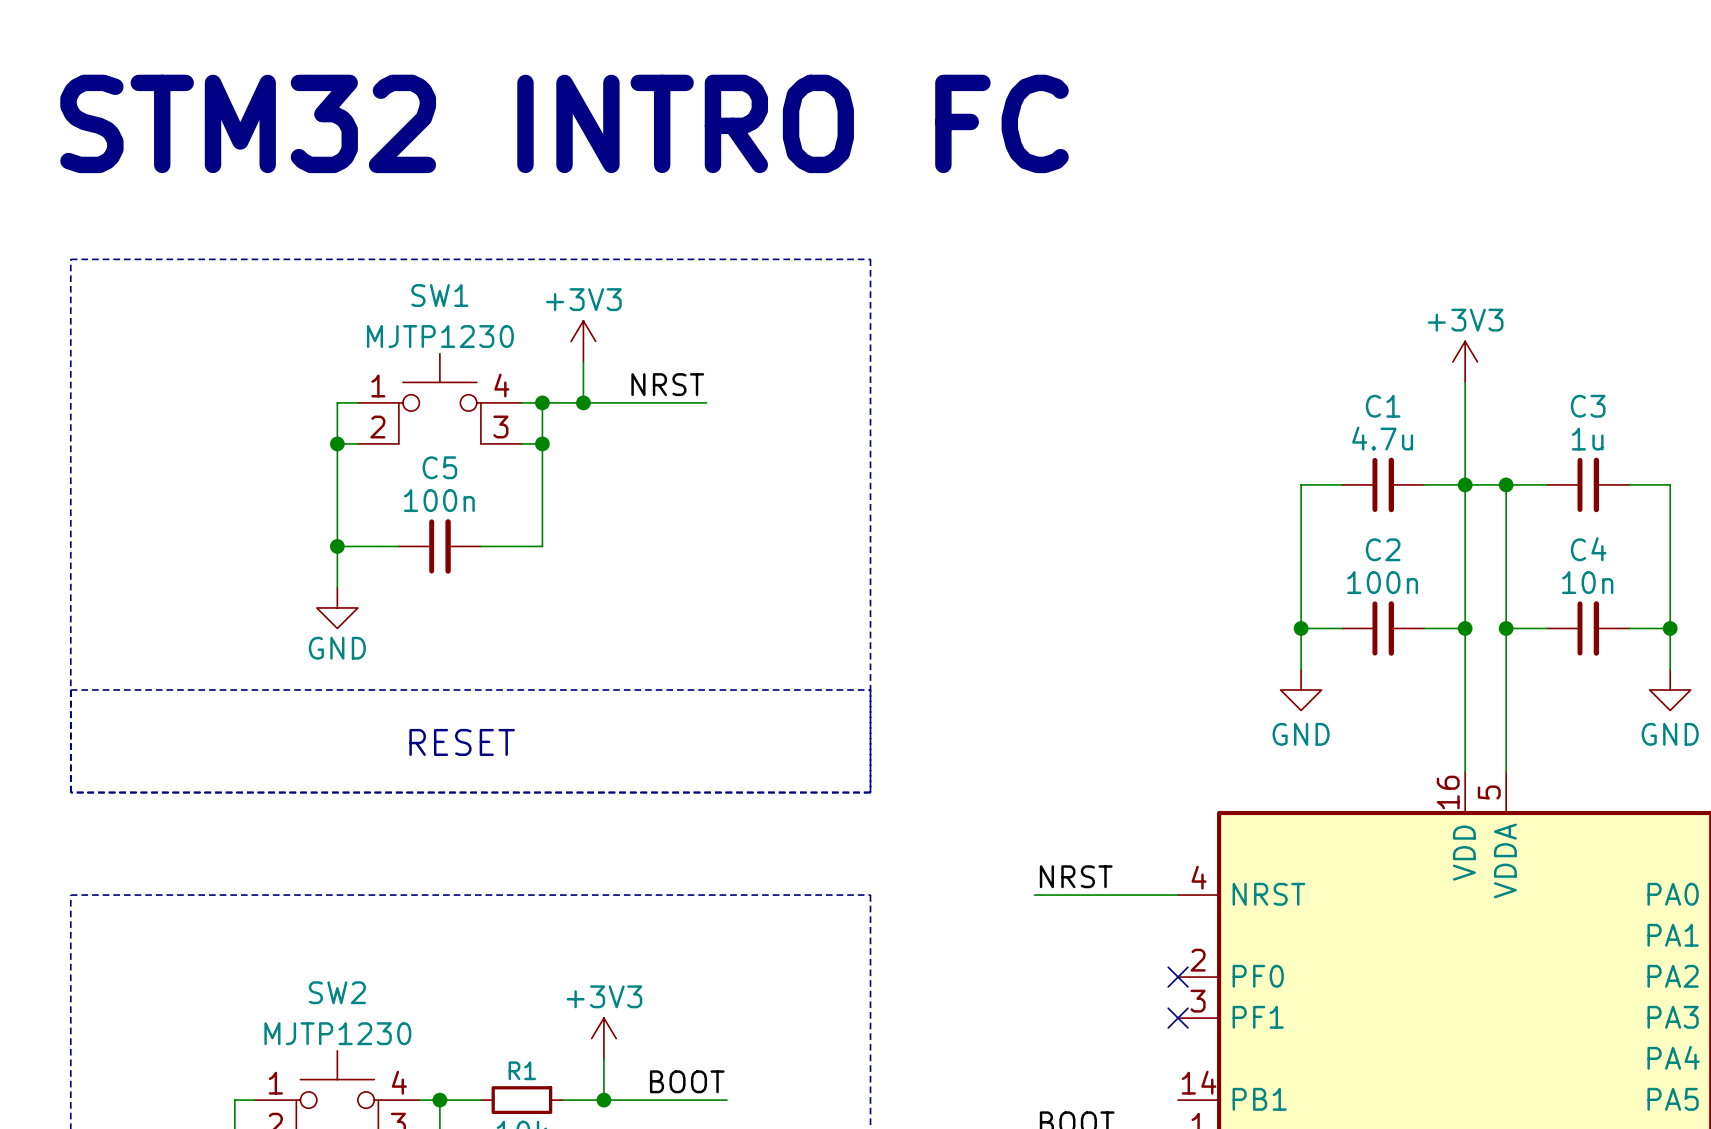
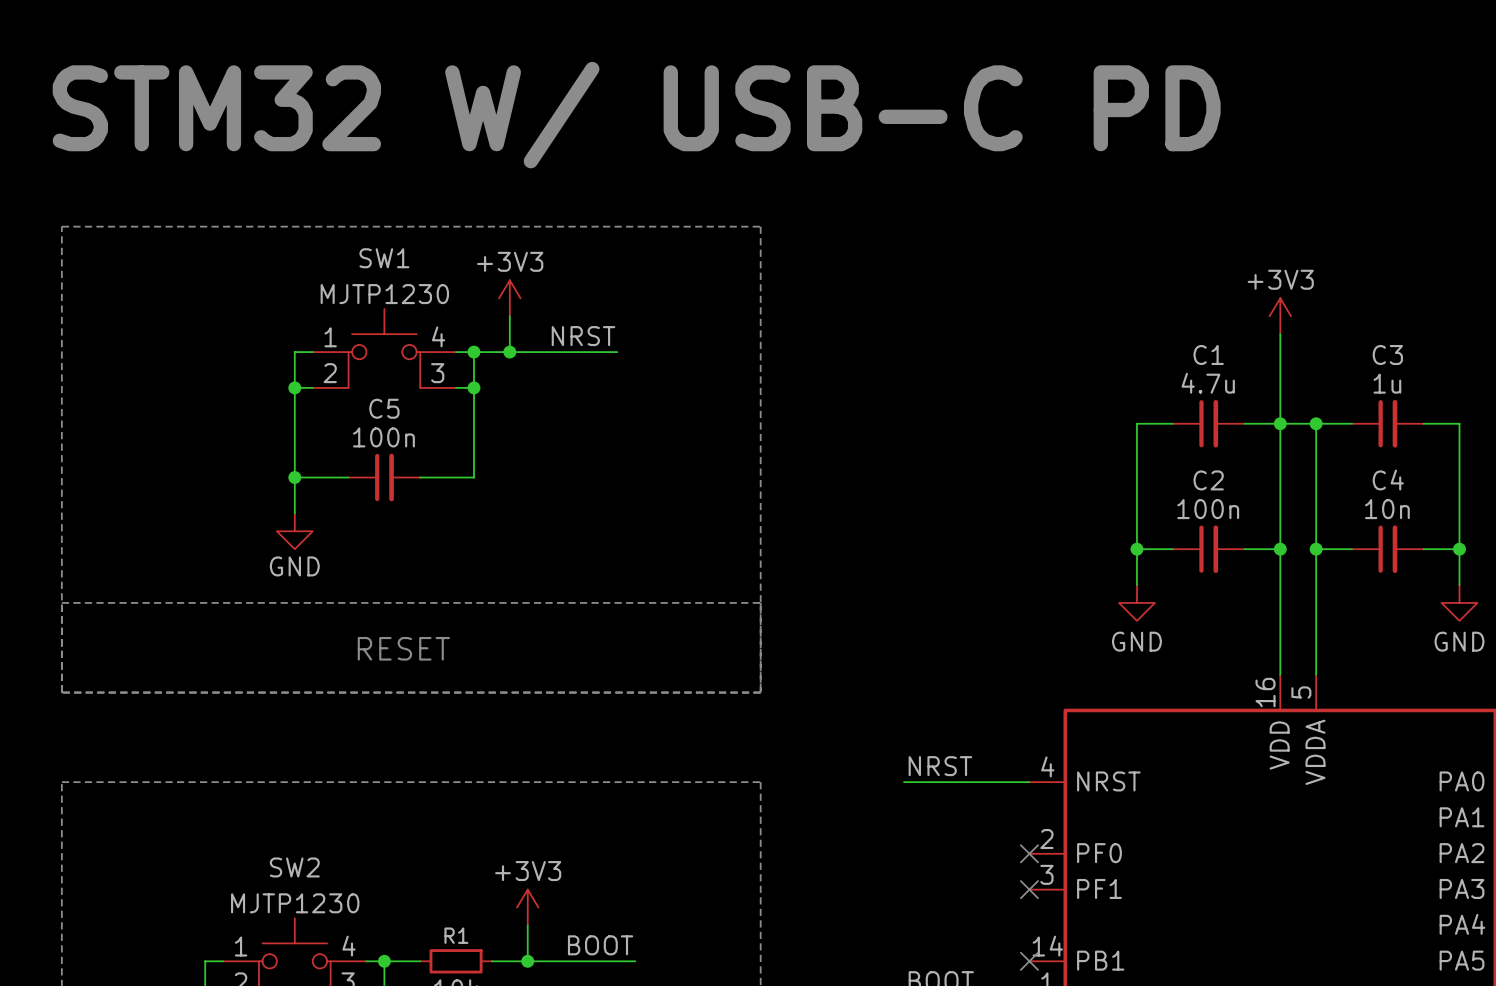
text: STM32 INTRO FC (564, 123) -> STM32 W/ USB-C PD (636, 115)
no-connect mark: none -> (1029, 961)

